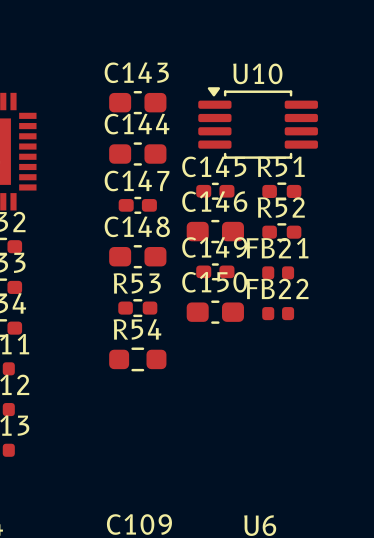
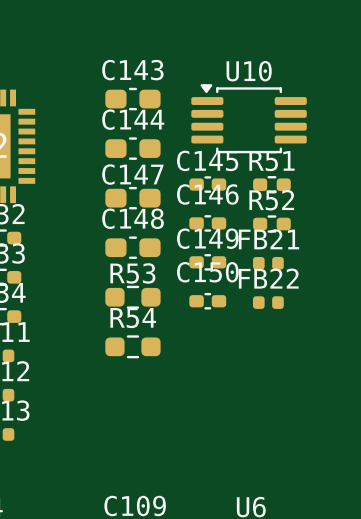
C147 footprint: [118, 196, 157, 214] -> [105, 186, 161, 210]
C146 footprint: [186, 219, 244, 244] -> [189, 215, 227, 232]
R53 footprint: [118, 299, 158, 318] -> [105, 285, 161, 309]
C150 footprint: [186, 300, 244, 324] -> [189, 292, 227, 310]

